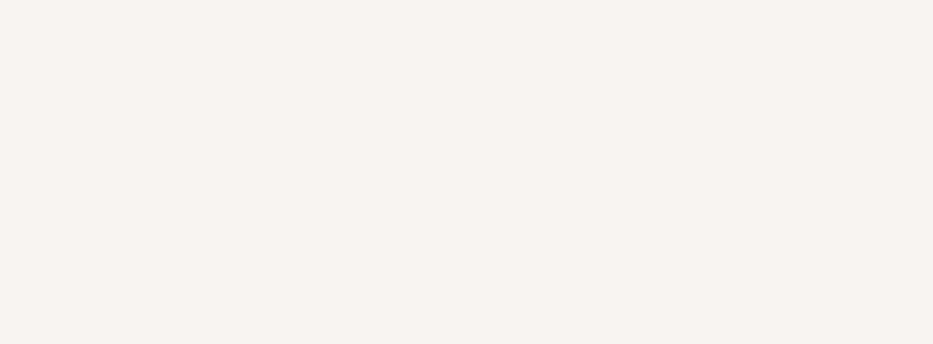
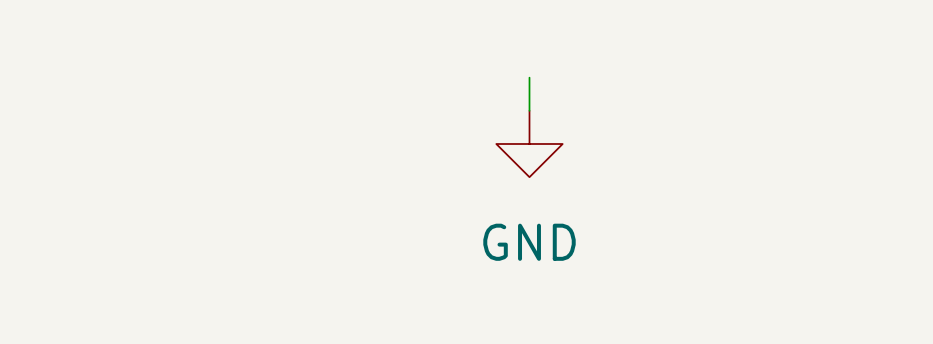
wire: none -> (529, 77) (529, 110)
power symbol: none -> GND (529, 143)

